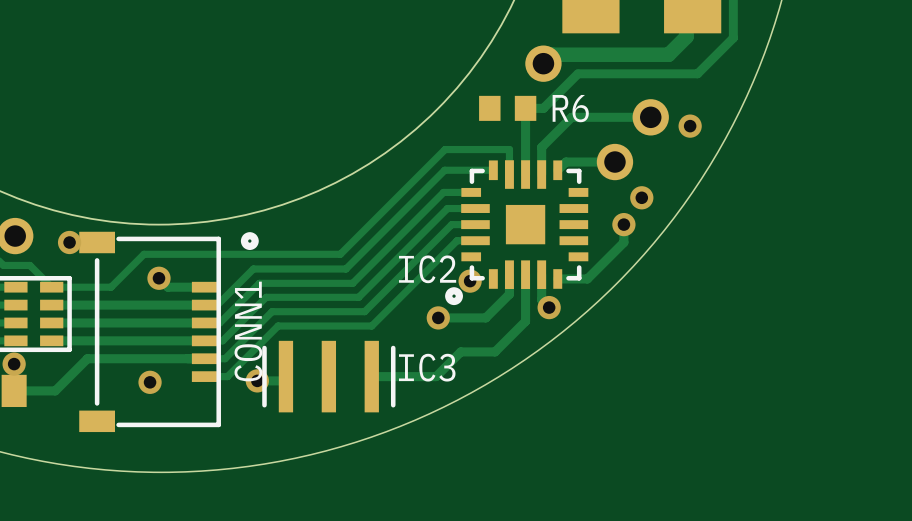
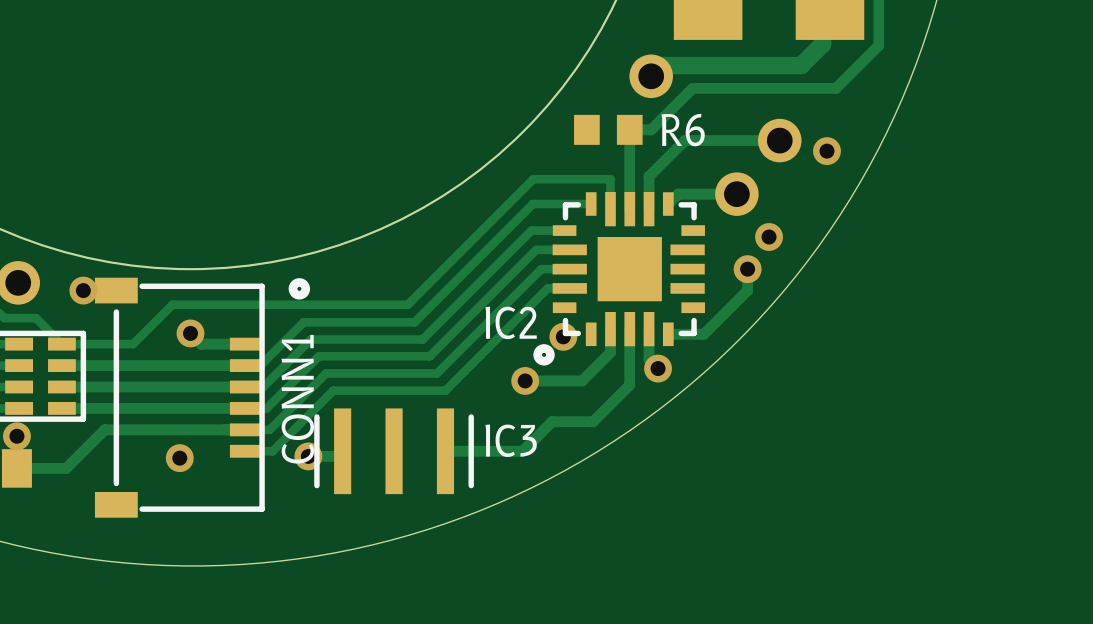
IC2 footprint: [445, 160, 589, 306] -> [533, 192, 705, 366]

